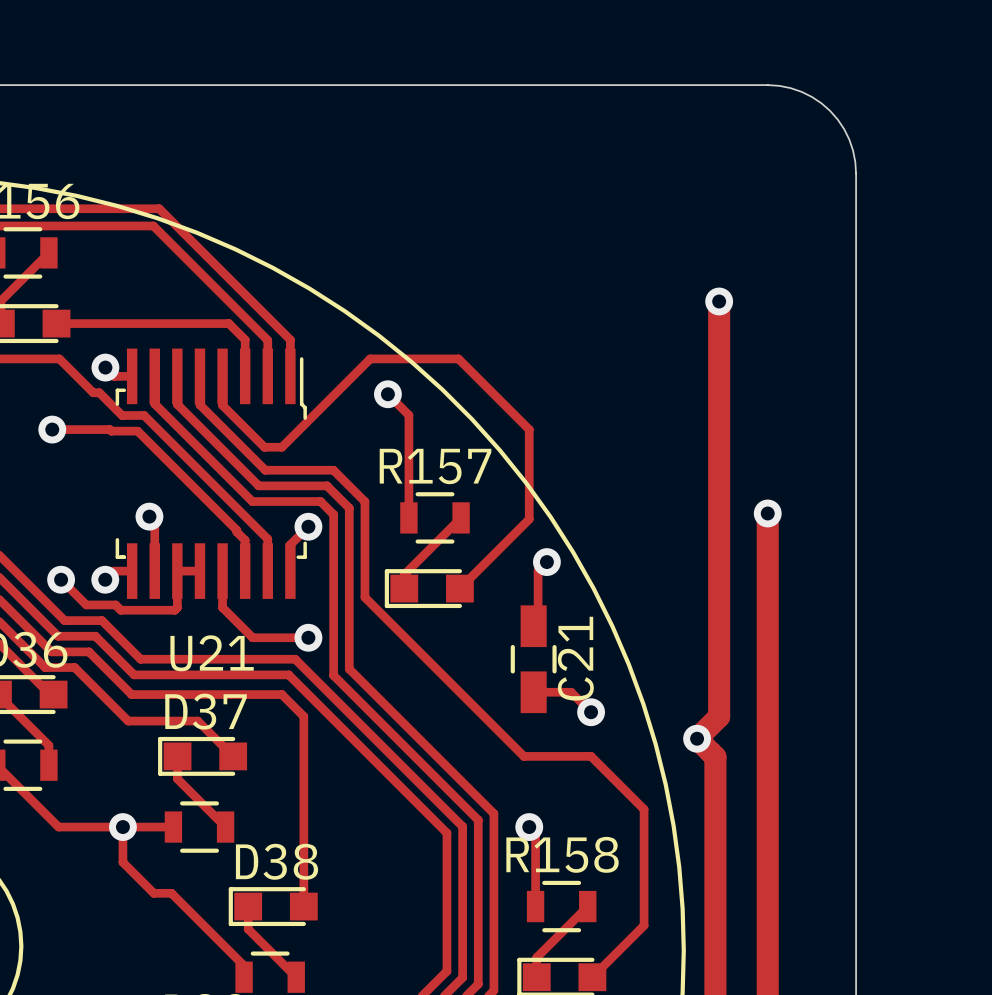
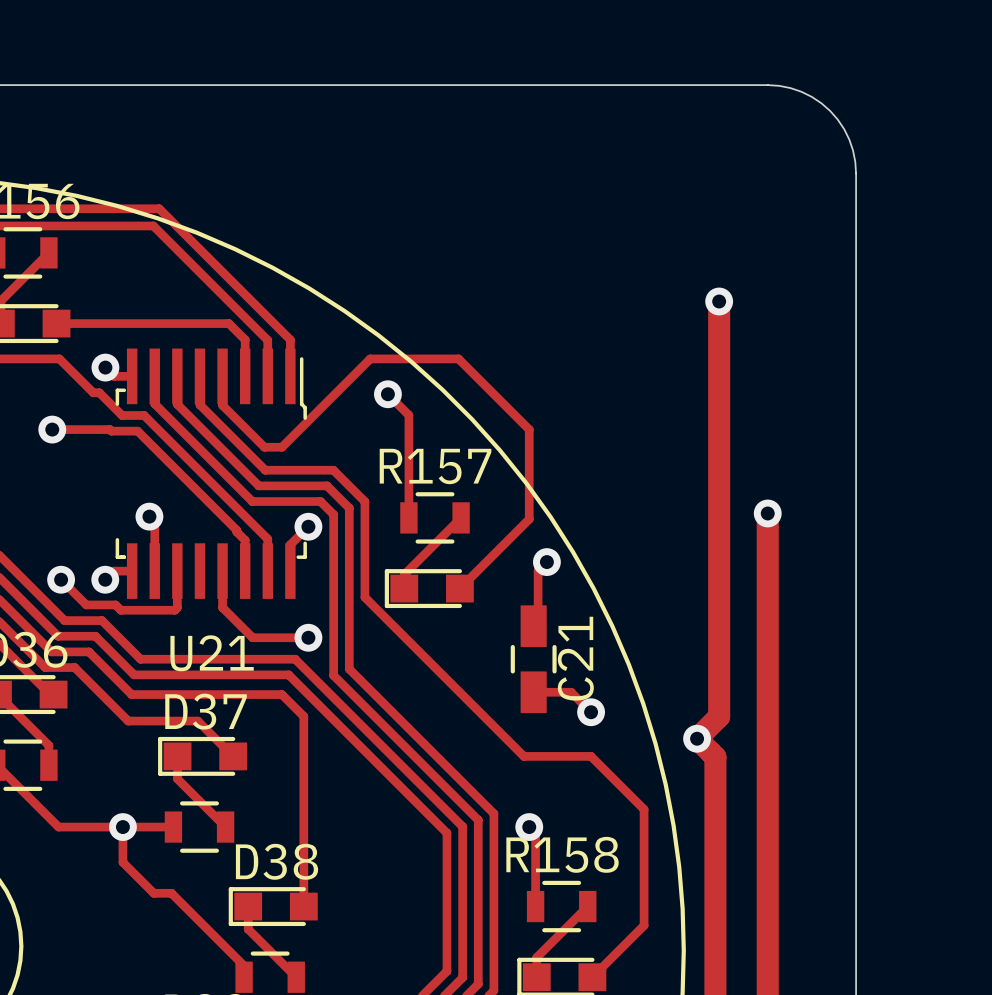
track: (177, 571) (199, 571) -> none

